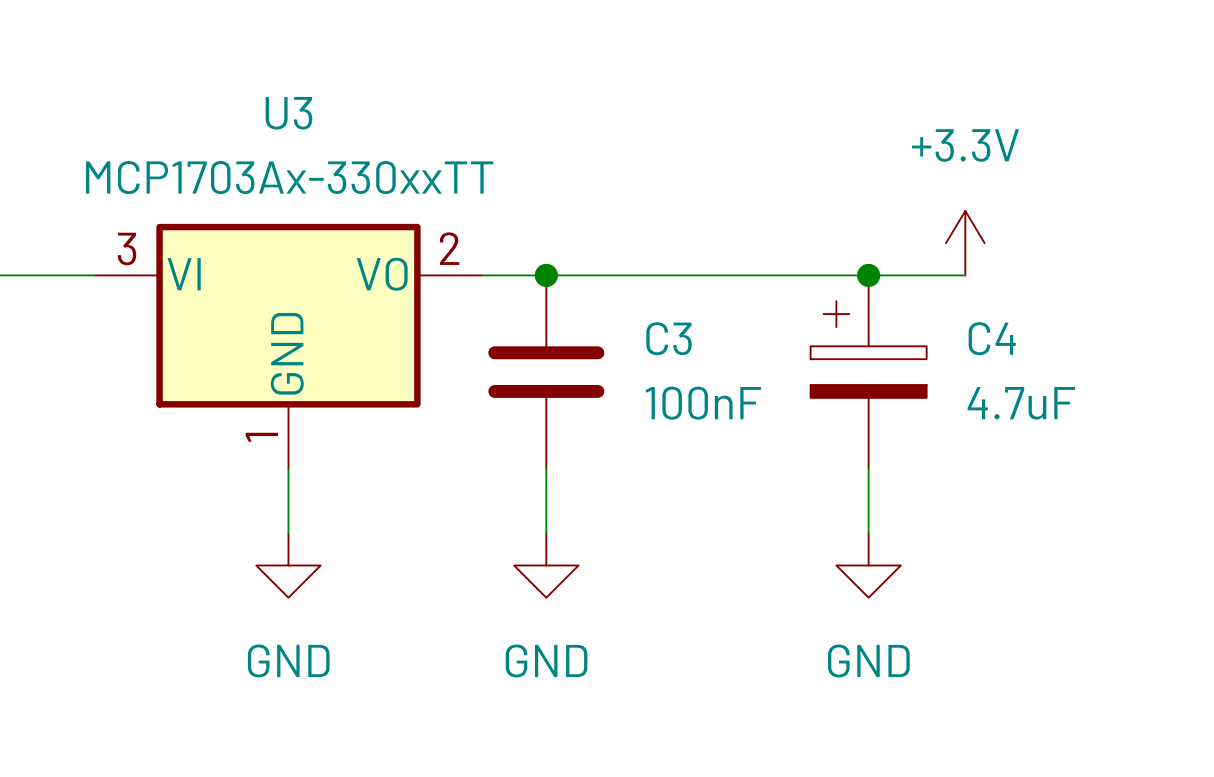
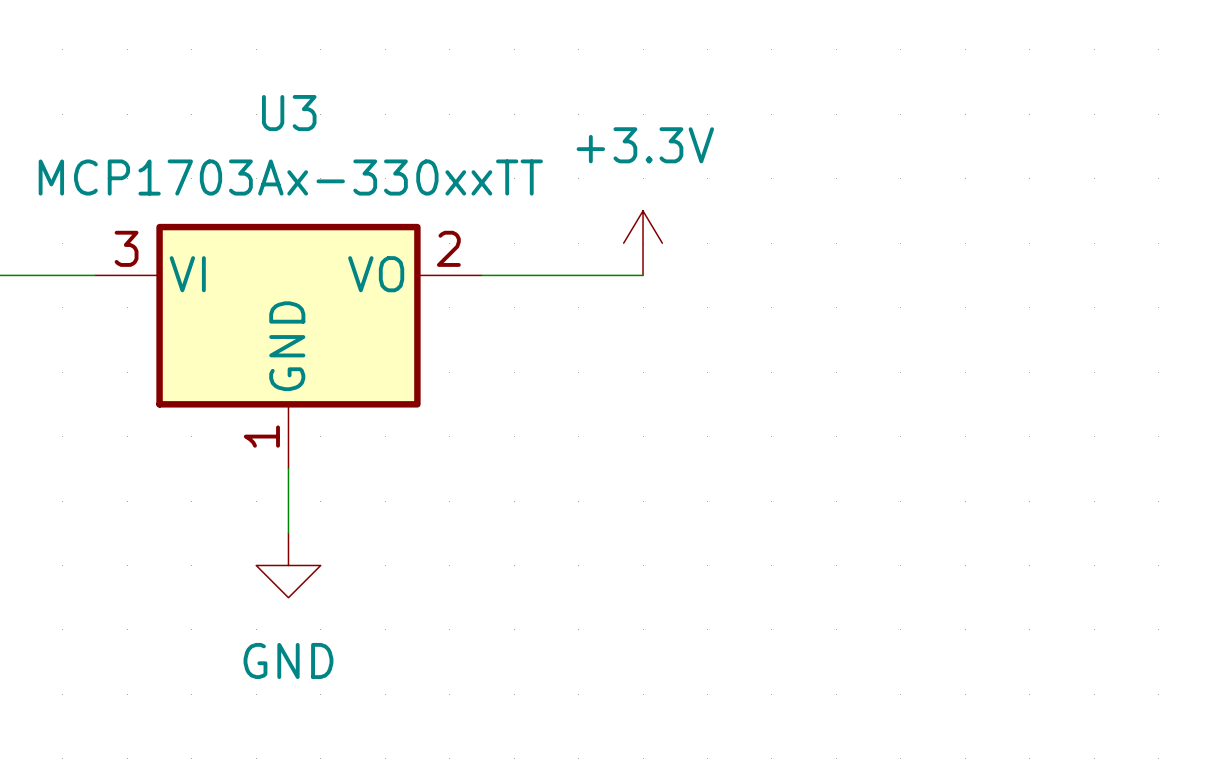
power symbol position: +3.3V (965, 243) -> +3.3V (643, 243)
junction: (546, 275) -> none
wire: (643, 275) (965, 275) -> none
junction: (868, 275) -> none
C3: 100nF (546, 372) -> none
C4: 4.7uF (868, 372) -> none
wire: (546, 468) (546, 533) -> none
wire: (868, 468) (868, 533) -> none
power symbol: GND (546, 565) -> none
power symbol: GND (868, 565) -> none

